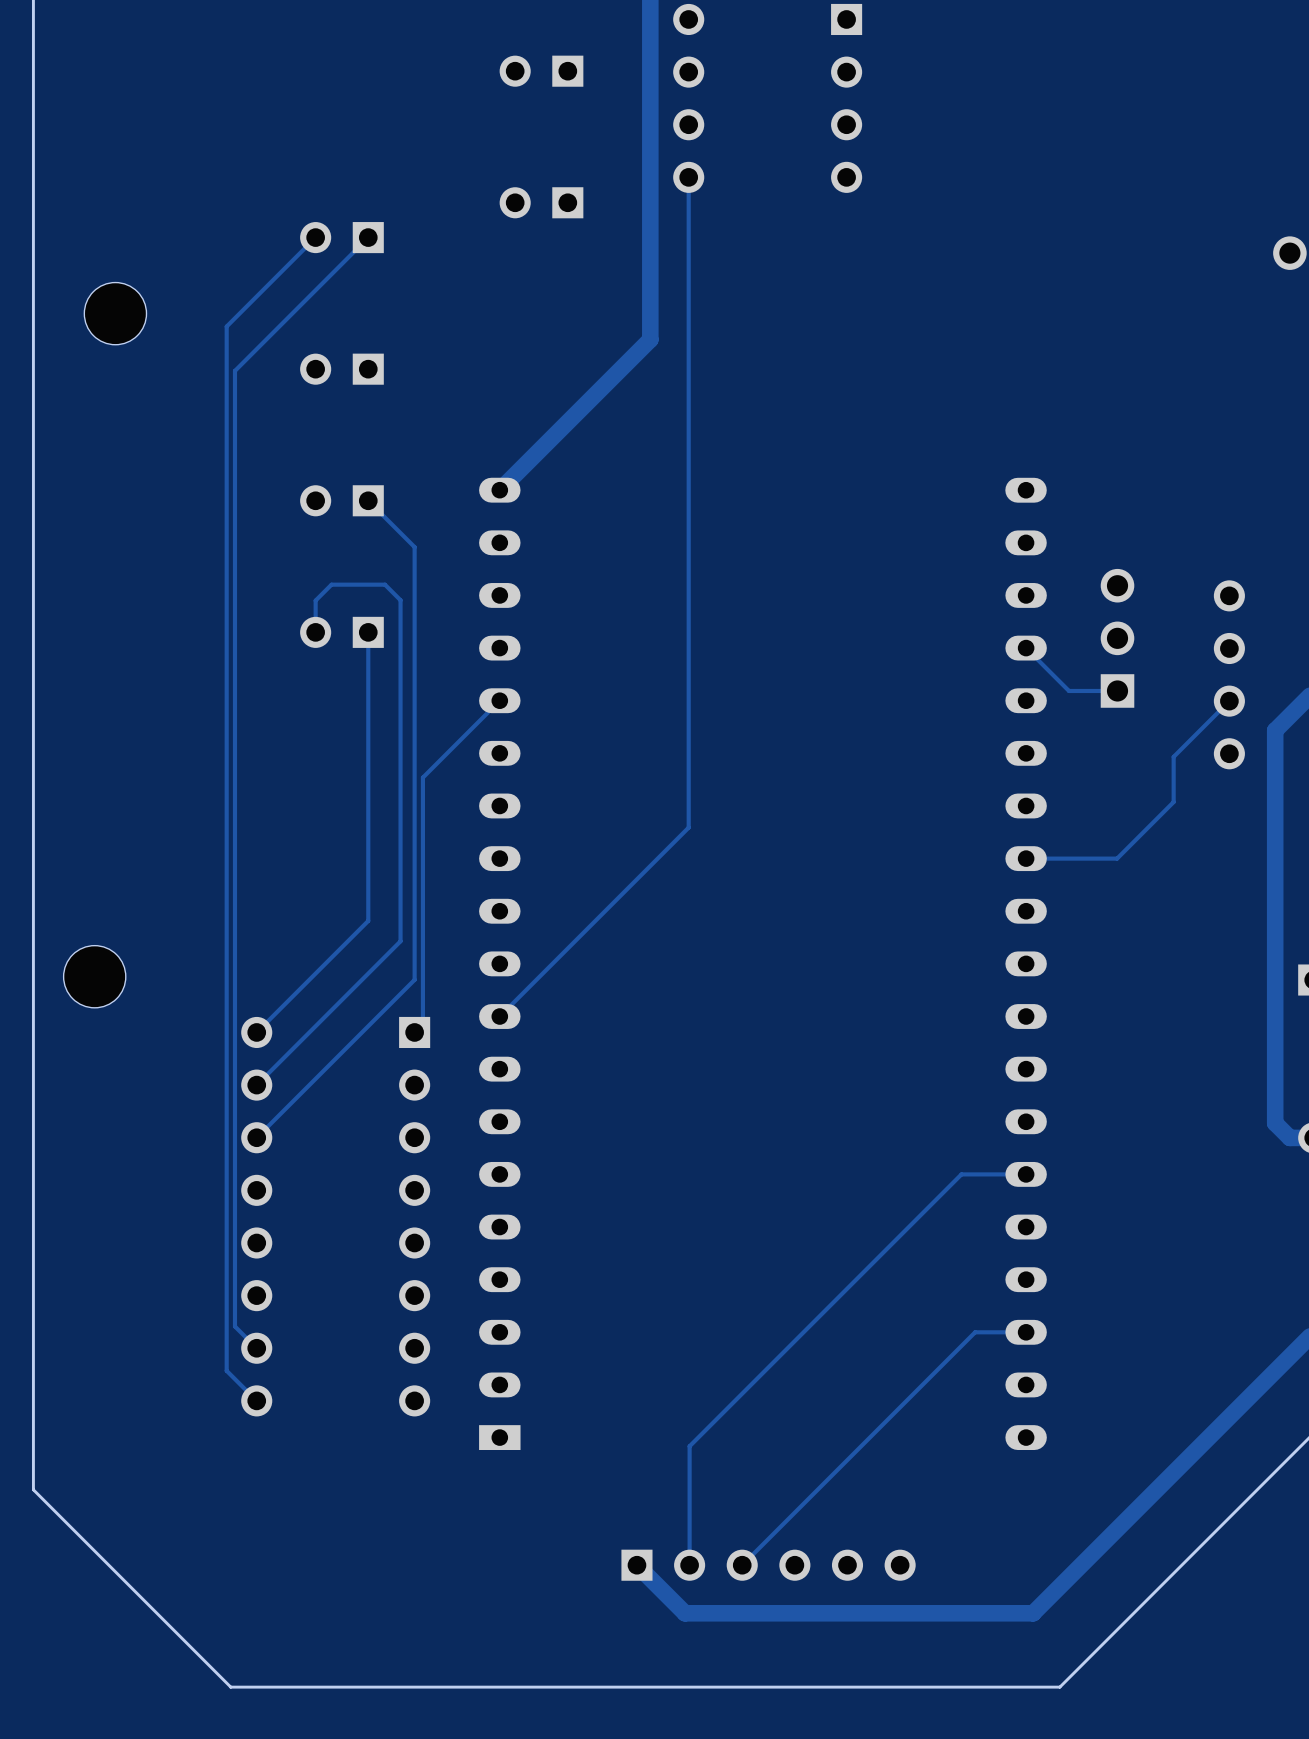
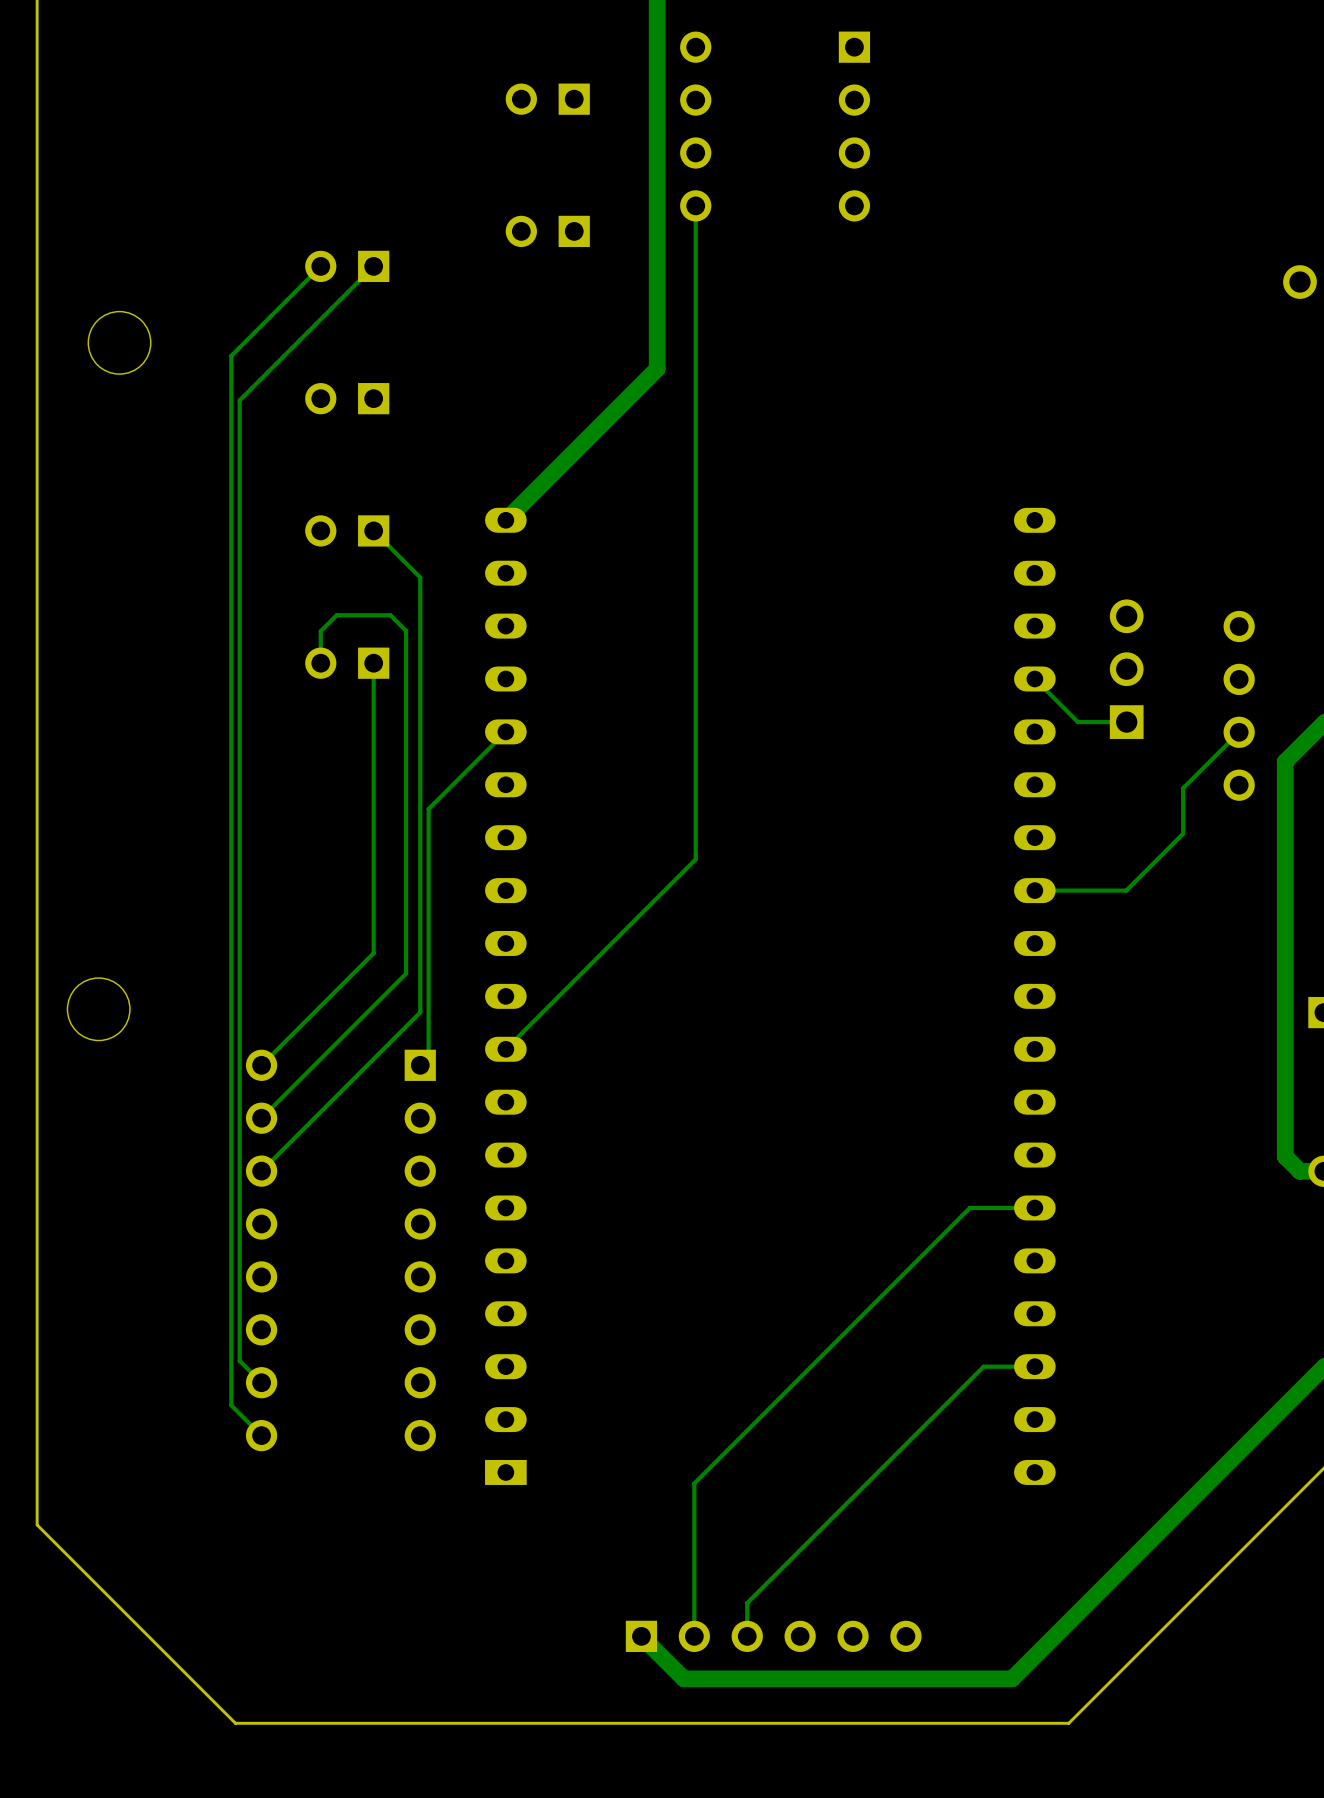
track: (689, 1446) (689, 1565) -> (696, 1481) (694, 1483) (694, 1636)
track: (636, 1565) (685, 1613) (1033, 1613) -> (641, 1636) (683, 1678) (1012, 1678) (1041, 1649)
track: none -> (749, 1600) (747, 1603) (747, 1636)
part position: (768, 1565) -> (773, 1636)

